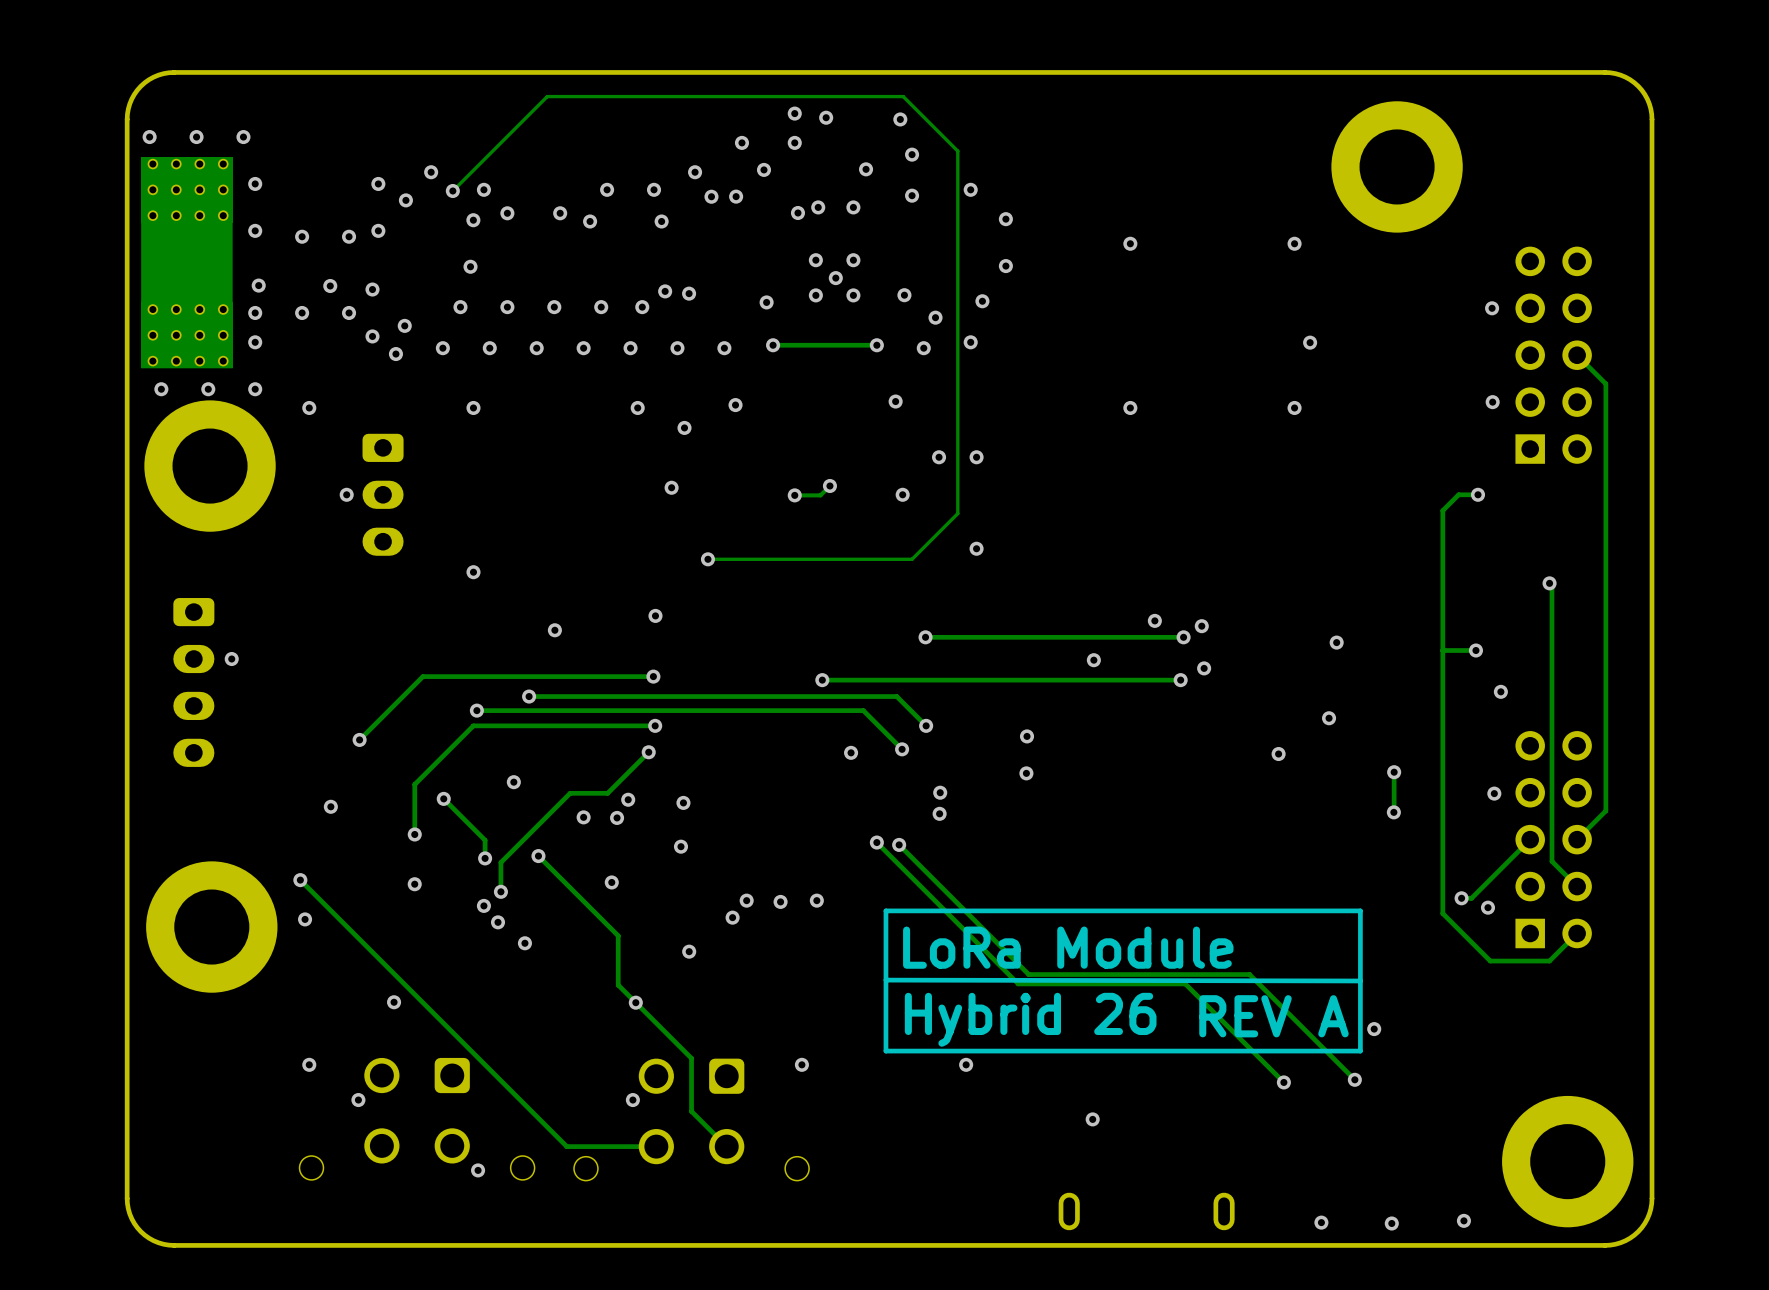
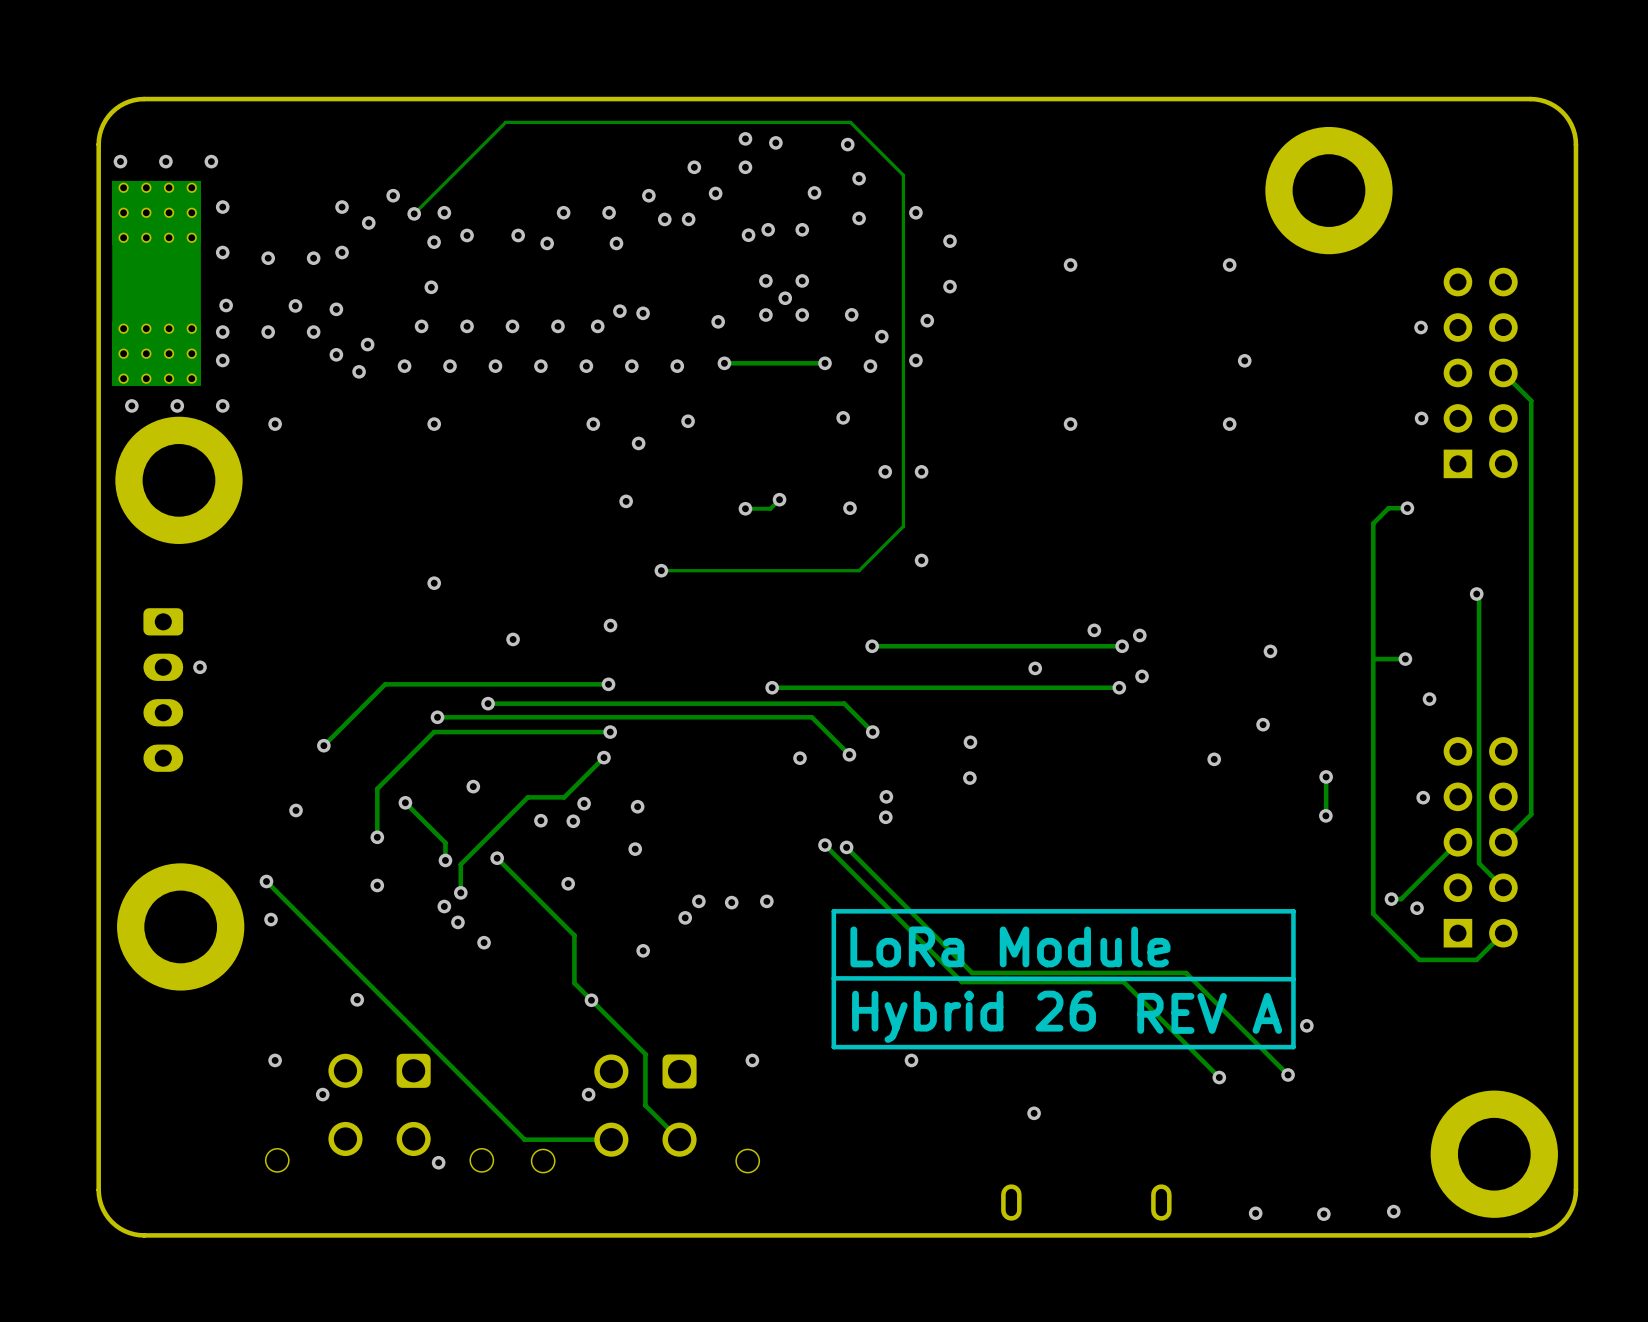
via: (346, 494) -> none
part: (383, 494) -> none

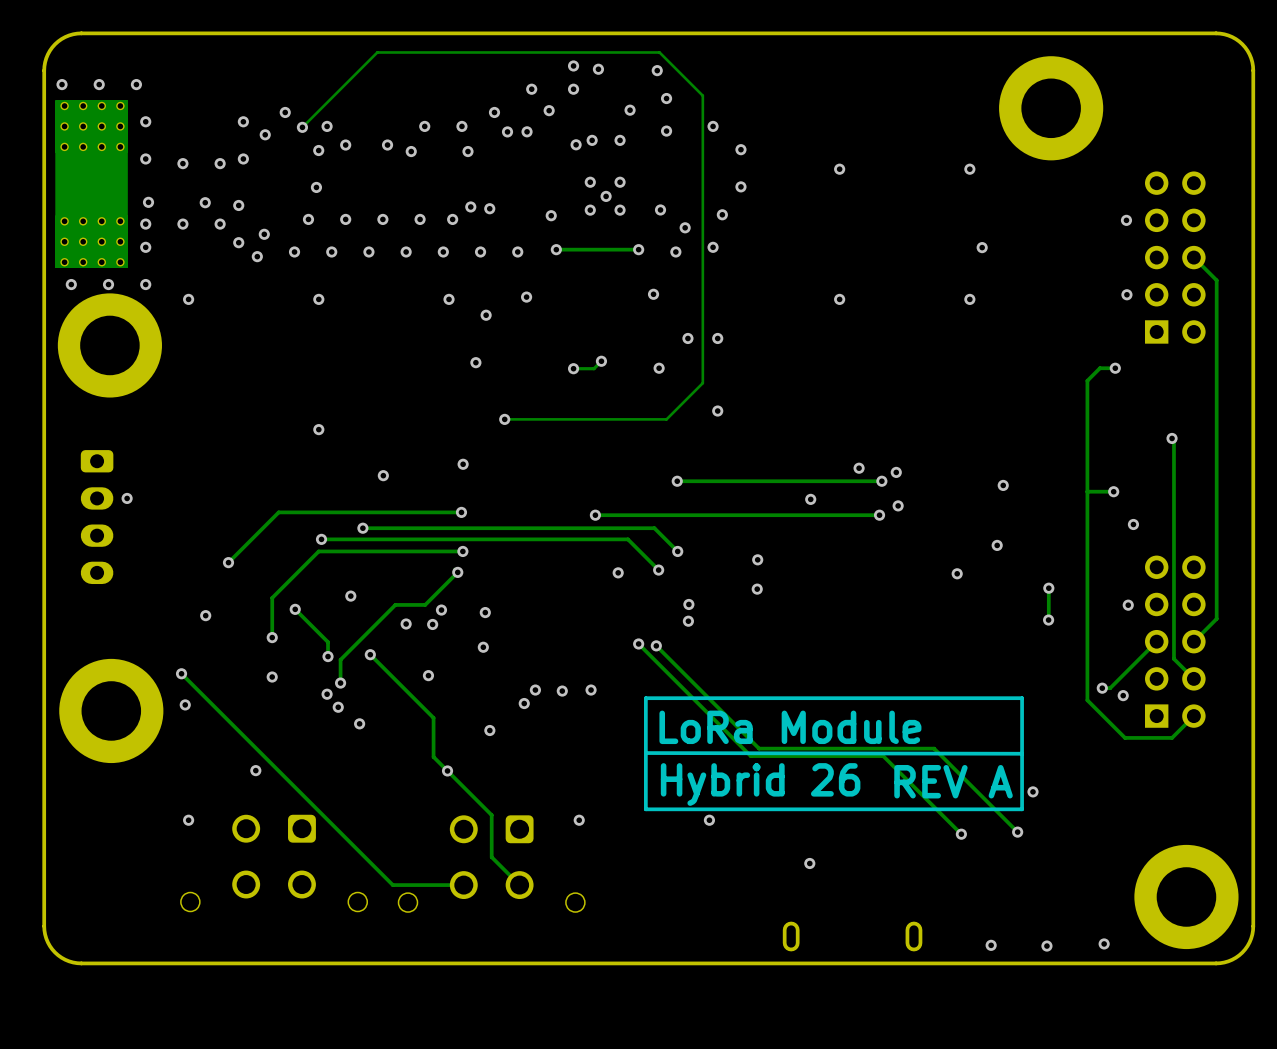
via: (322, 1094) -> none
via: (588, 1094) -> none
via: (438, 1162) -> none

